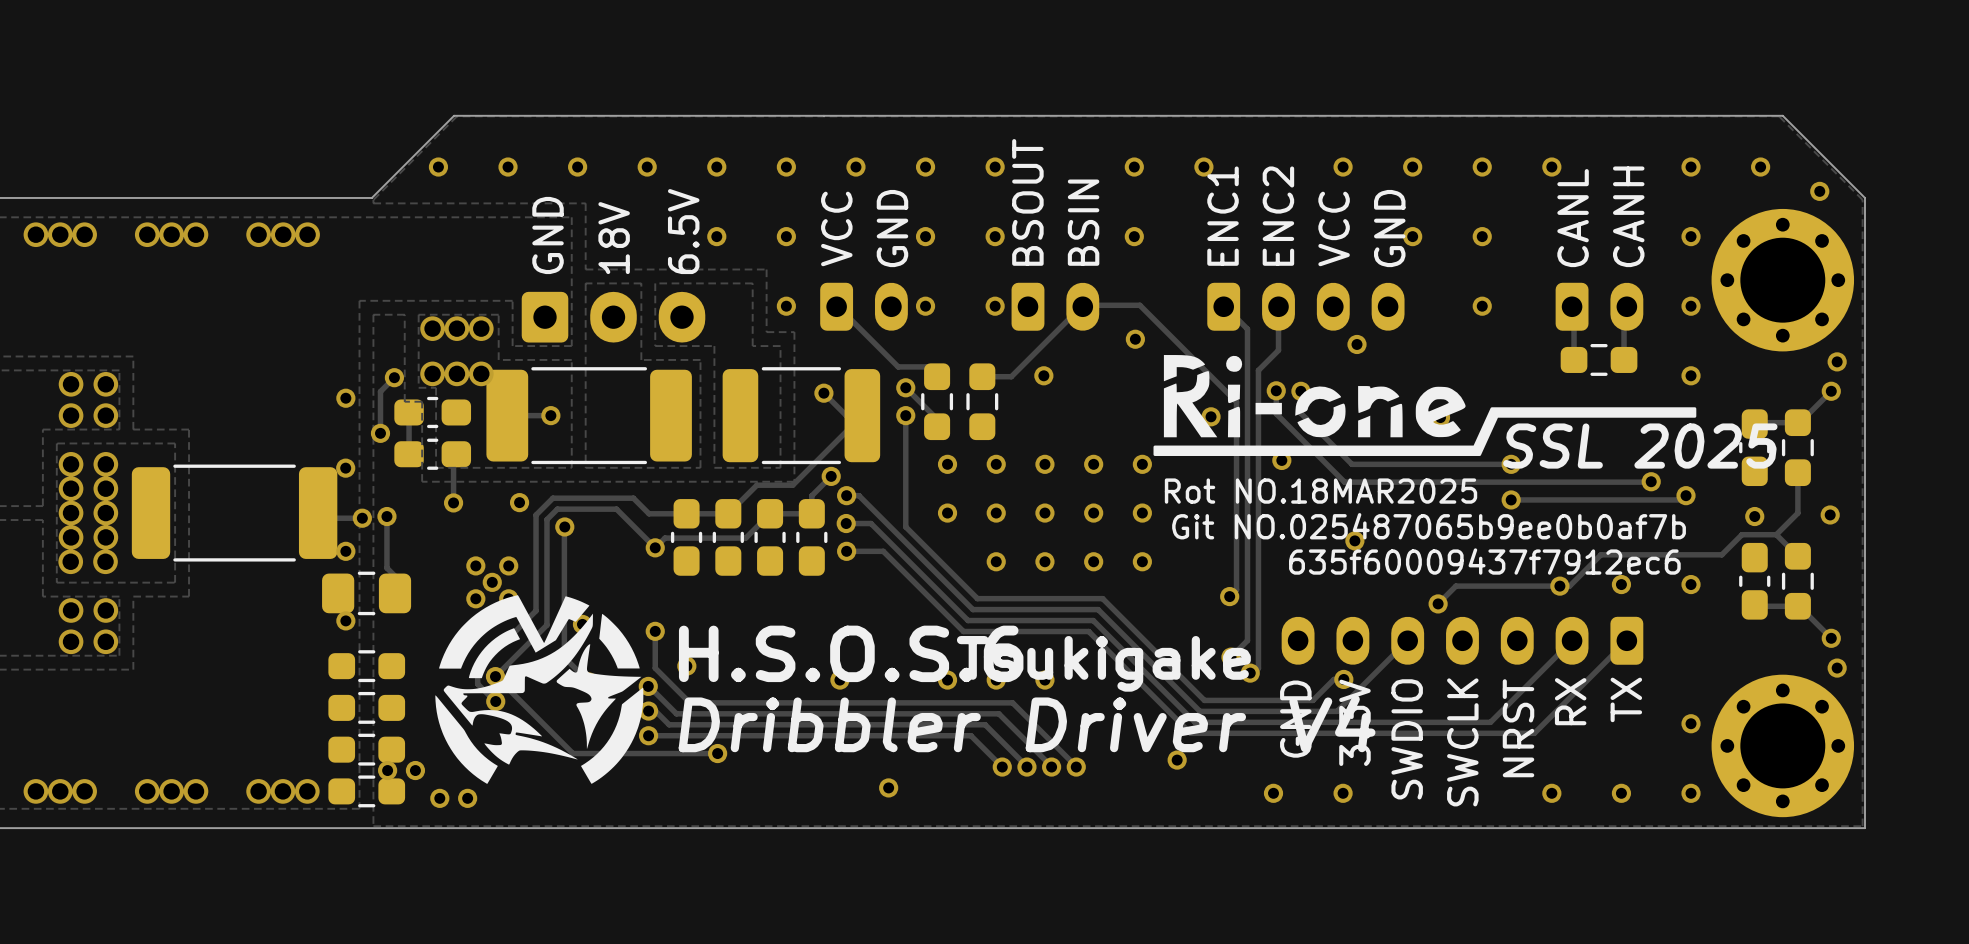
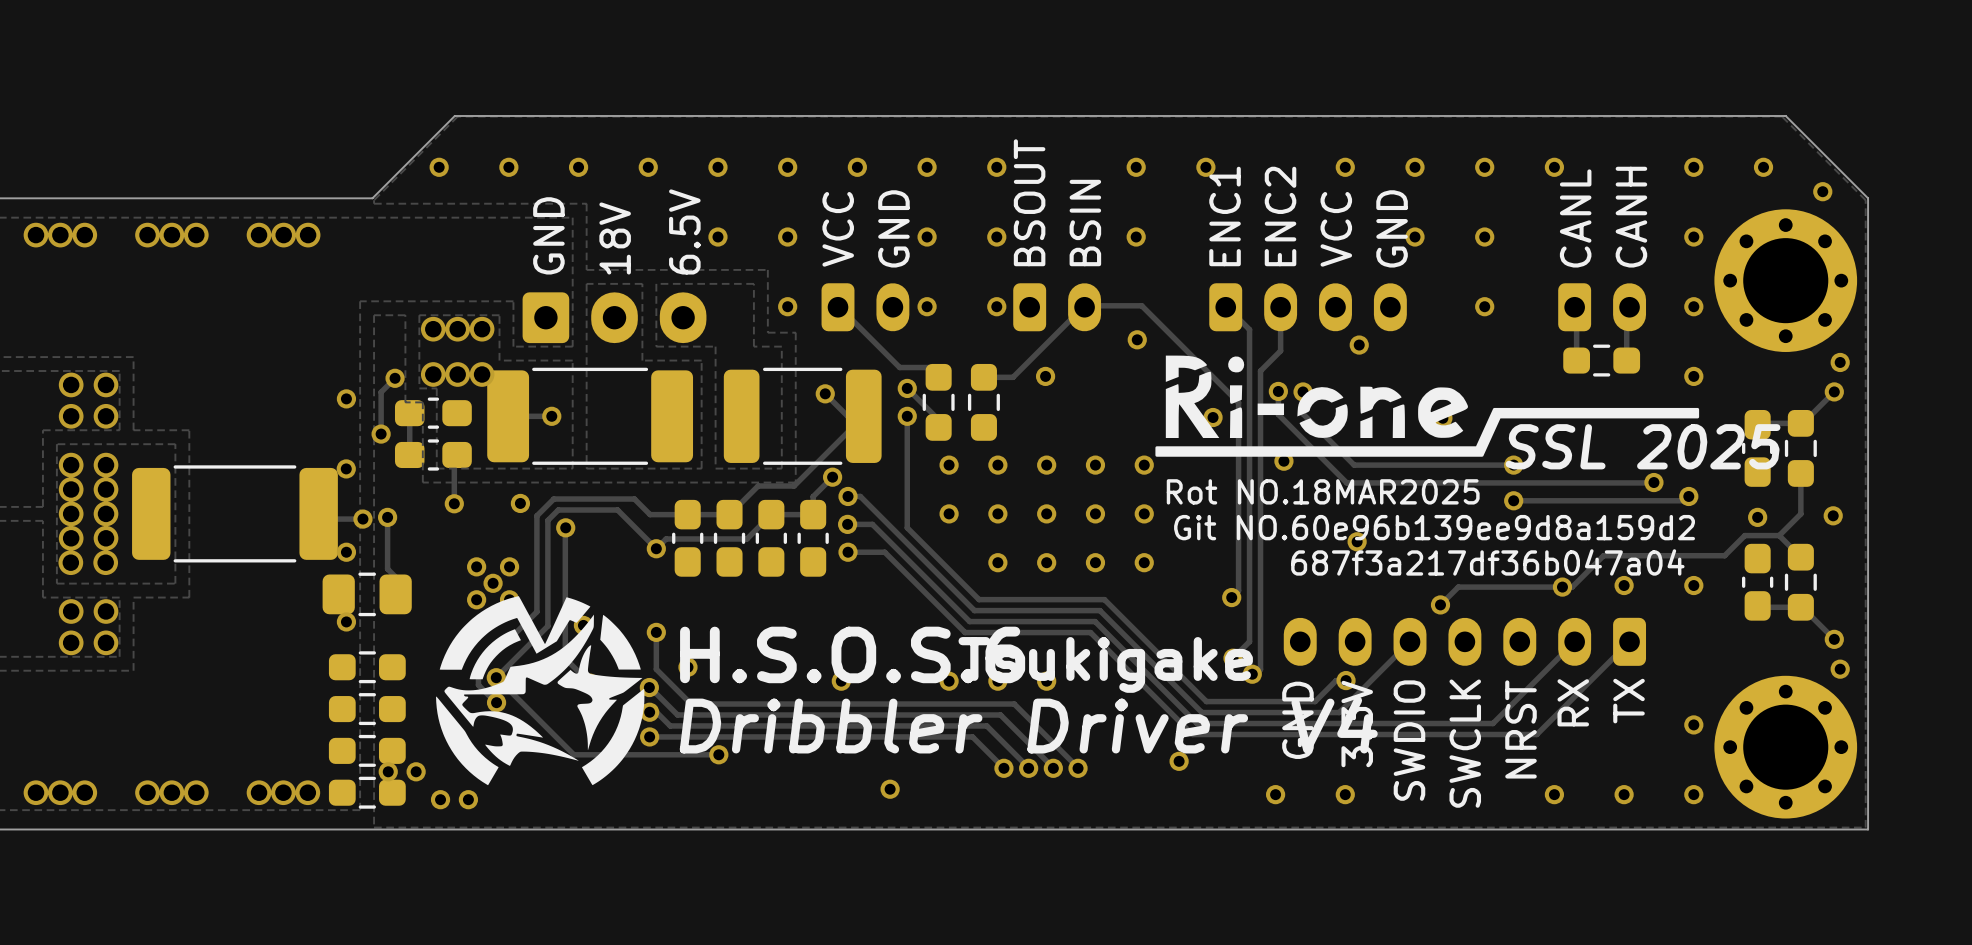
text: Git NO.025487065b9ee0b0af7b (1429, 526) -> Git NO.60e96b139ee9d8a159d2 (1434, 527)
text: 635f60009437f7912ec6 (1484, 561) -> 687f3a217df36b047a04 (1487, 562)

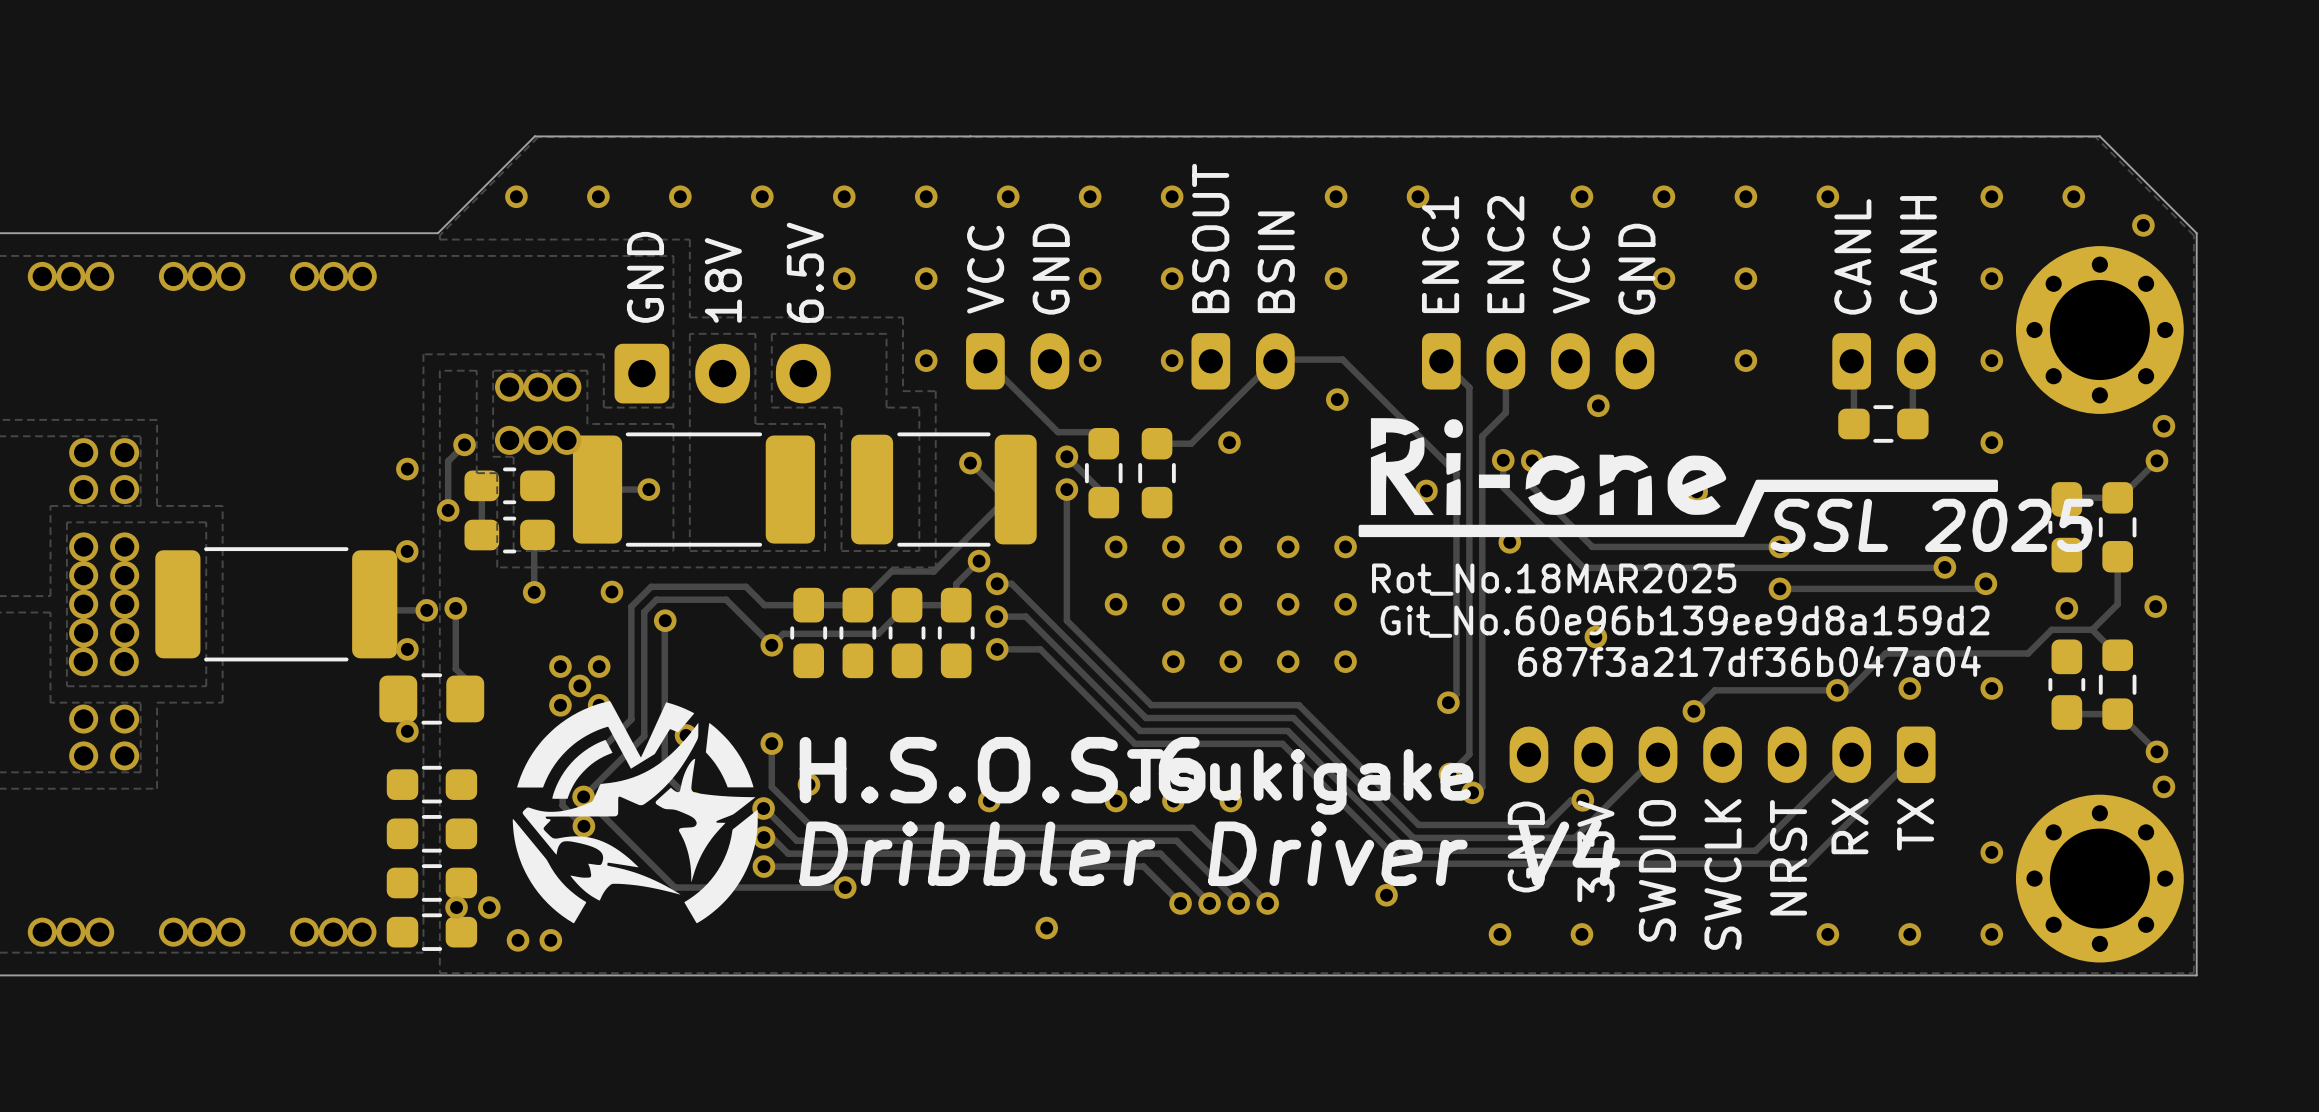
text: Rot NO.18MAR2025 (1323, 491) -> Rot_No.18MAR2025 (1554, 579)
text: Git NO.60e96b139ee9d8a159d2 (1434, 527) -> Git_No.60e96b139ee9d8a159d2 (1685, 621)

